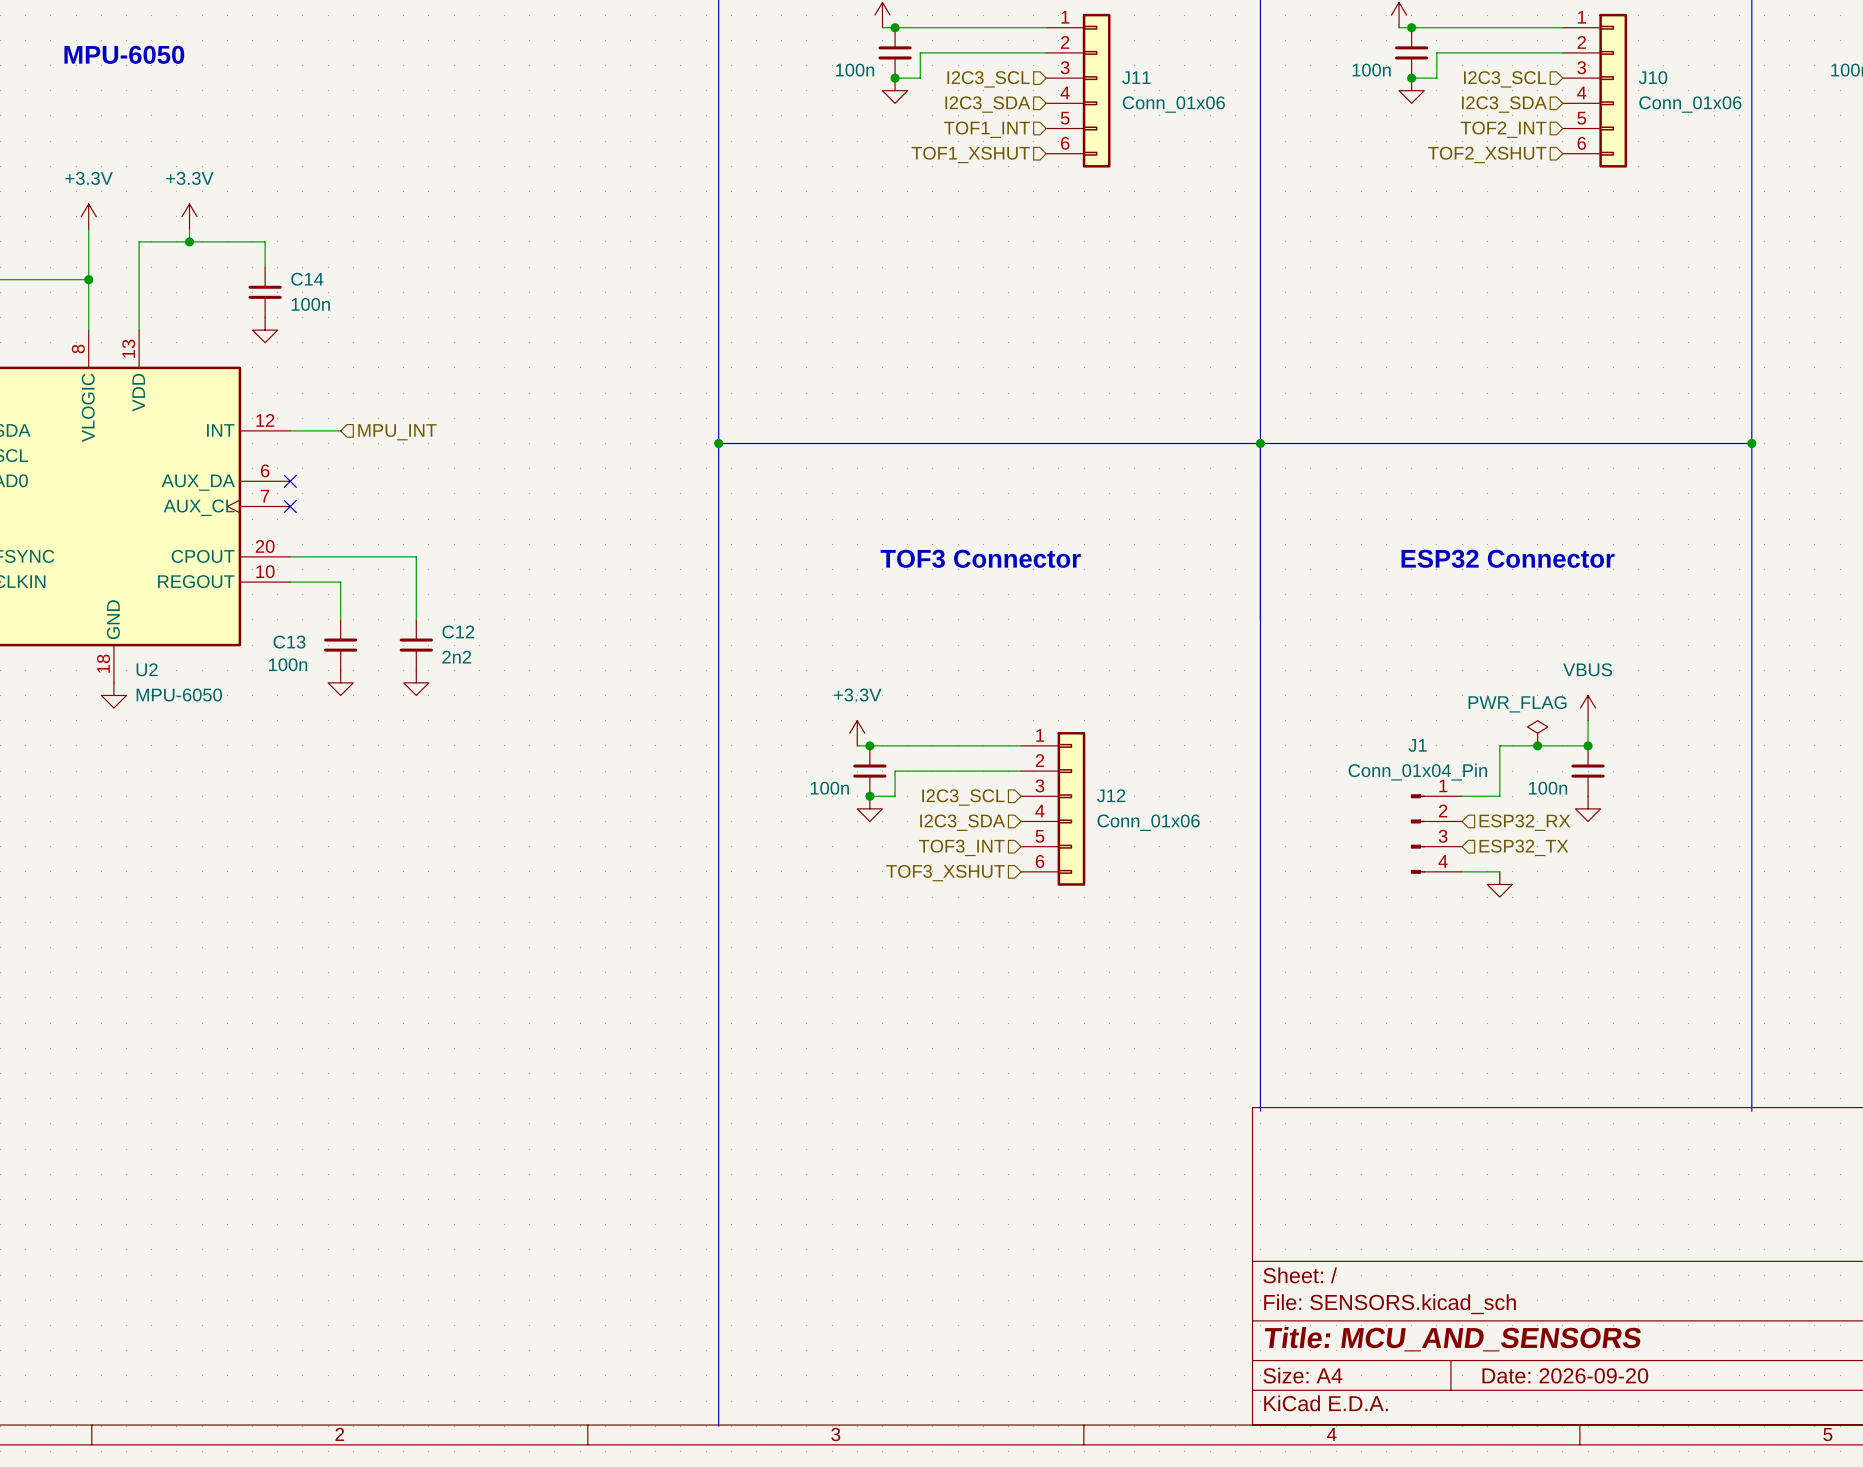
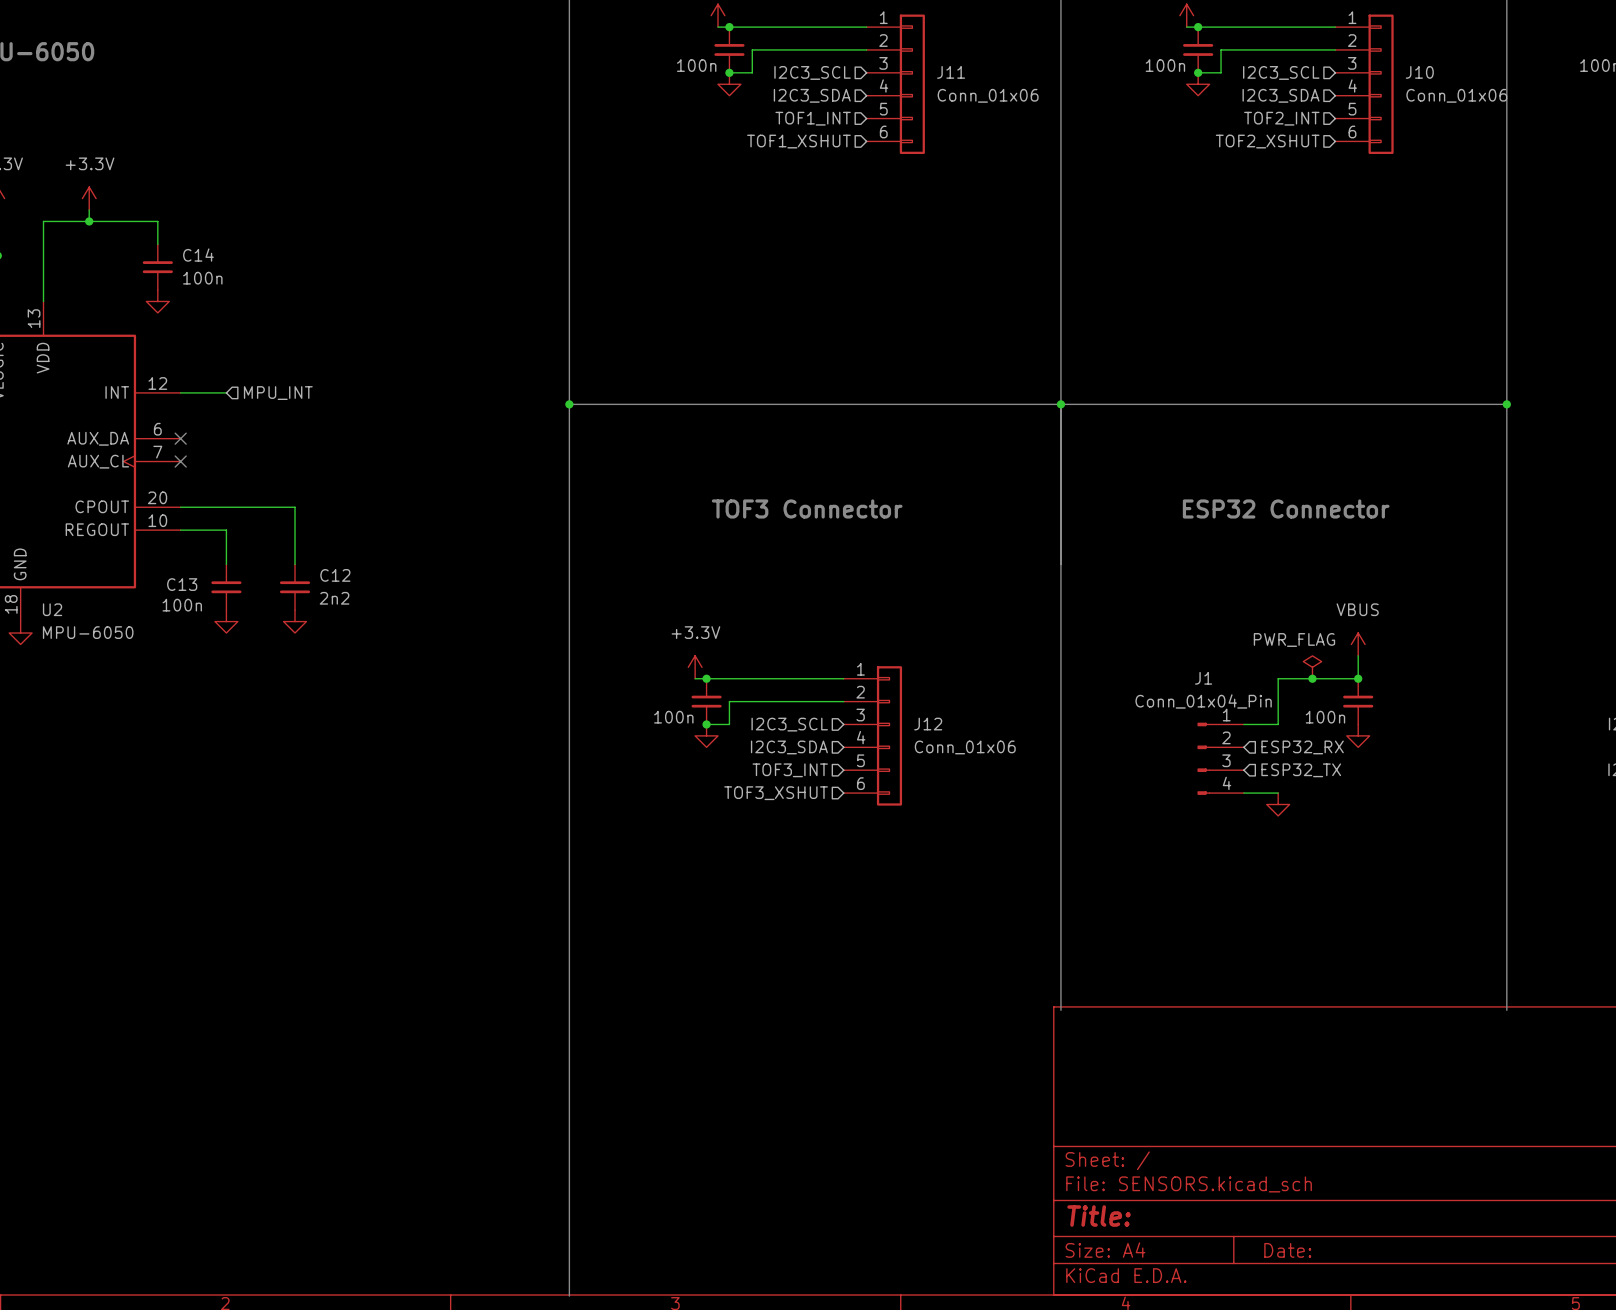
title block: Title: MCU_AND_SENSORS (1452, 1339) -> Title: (1099, 1216)
title block: Date: 2026-09-20 (1565, 1375) -> Date: (1287, 1250)

